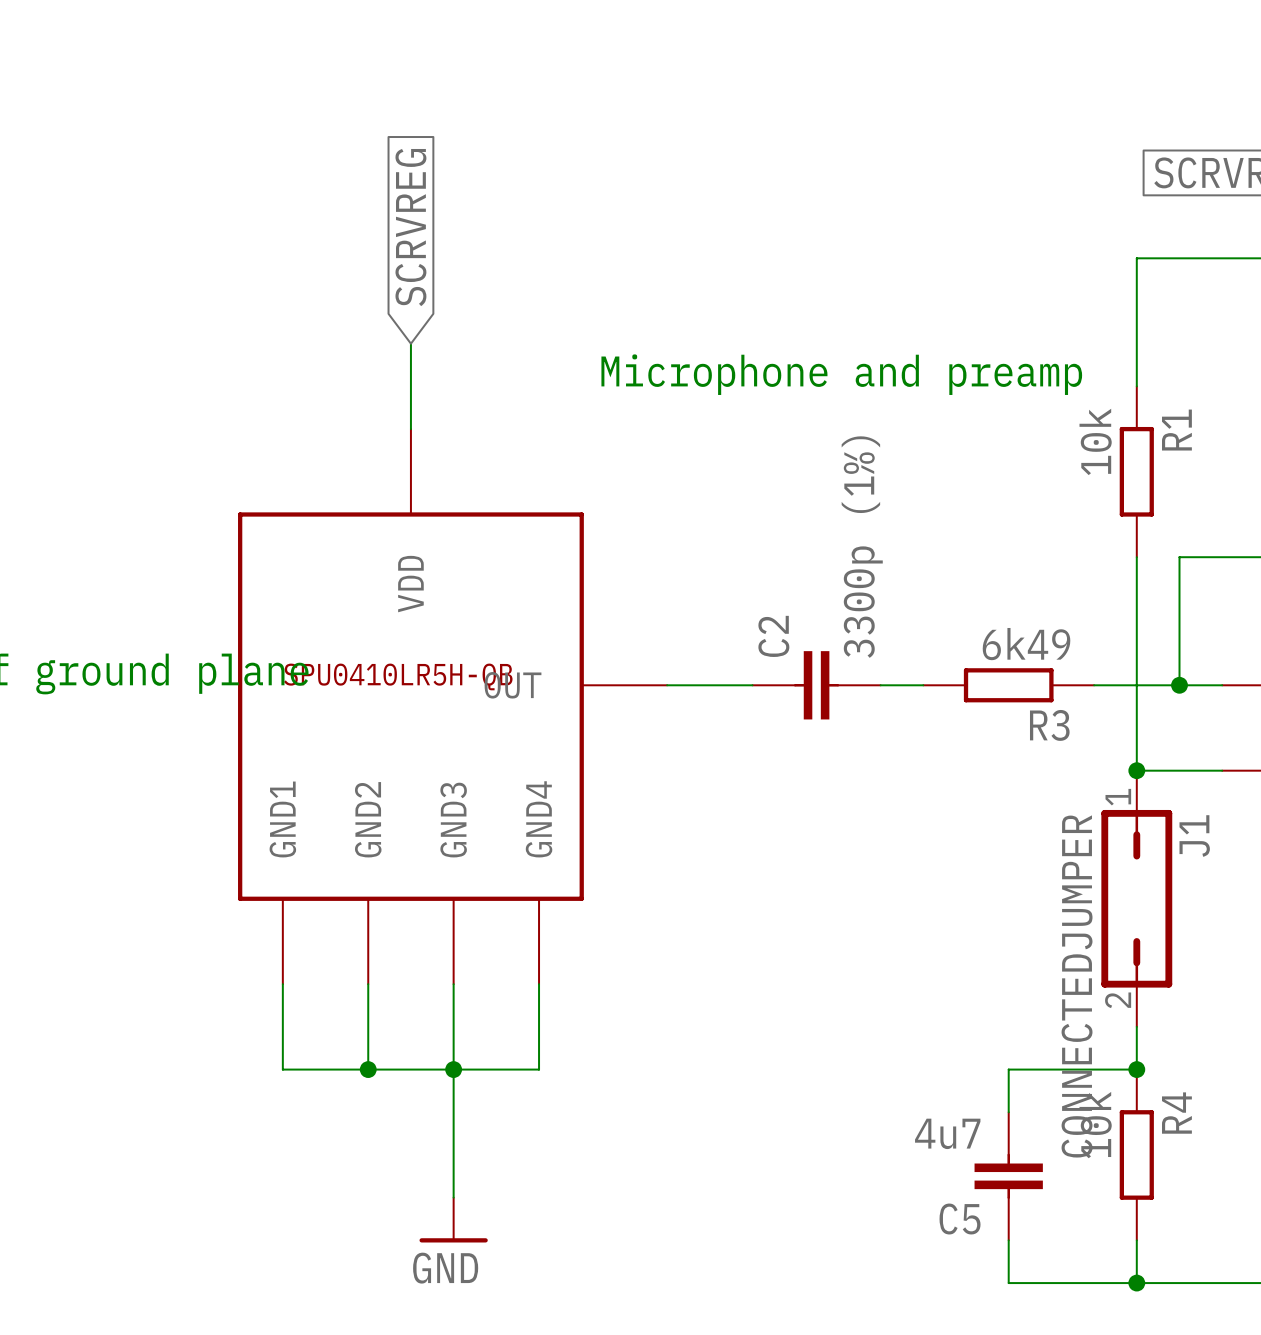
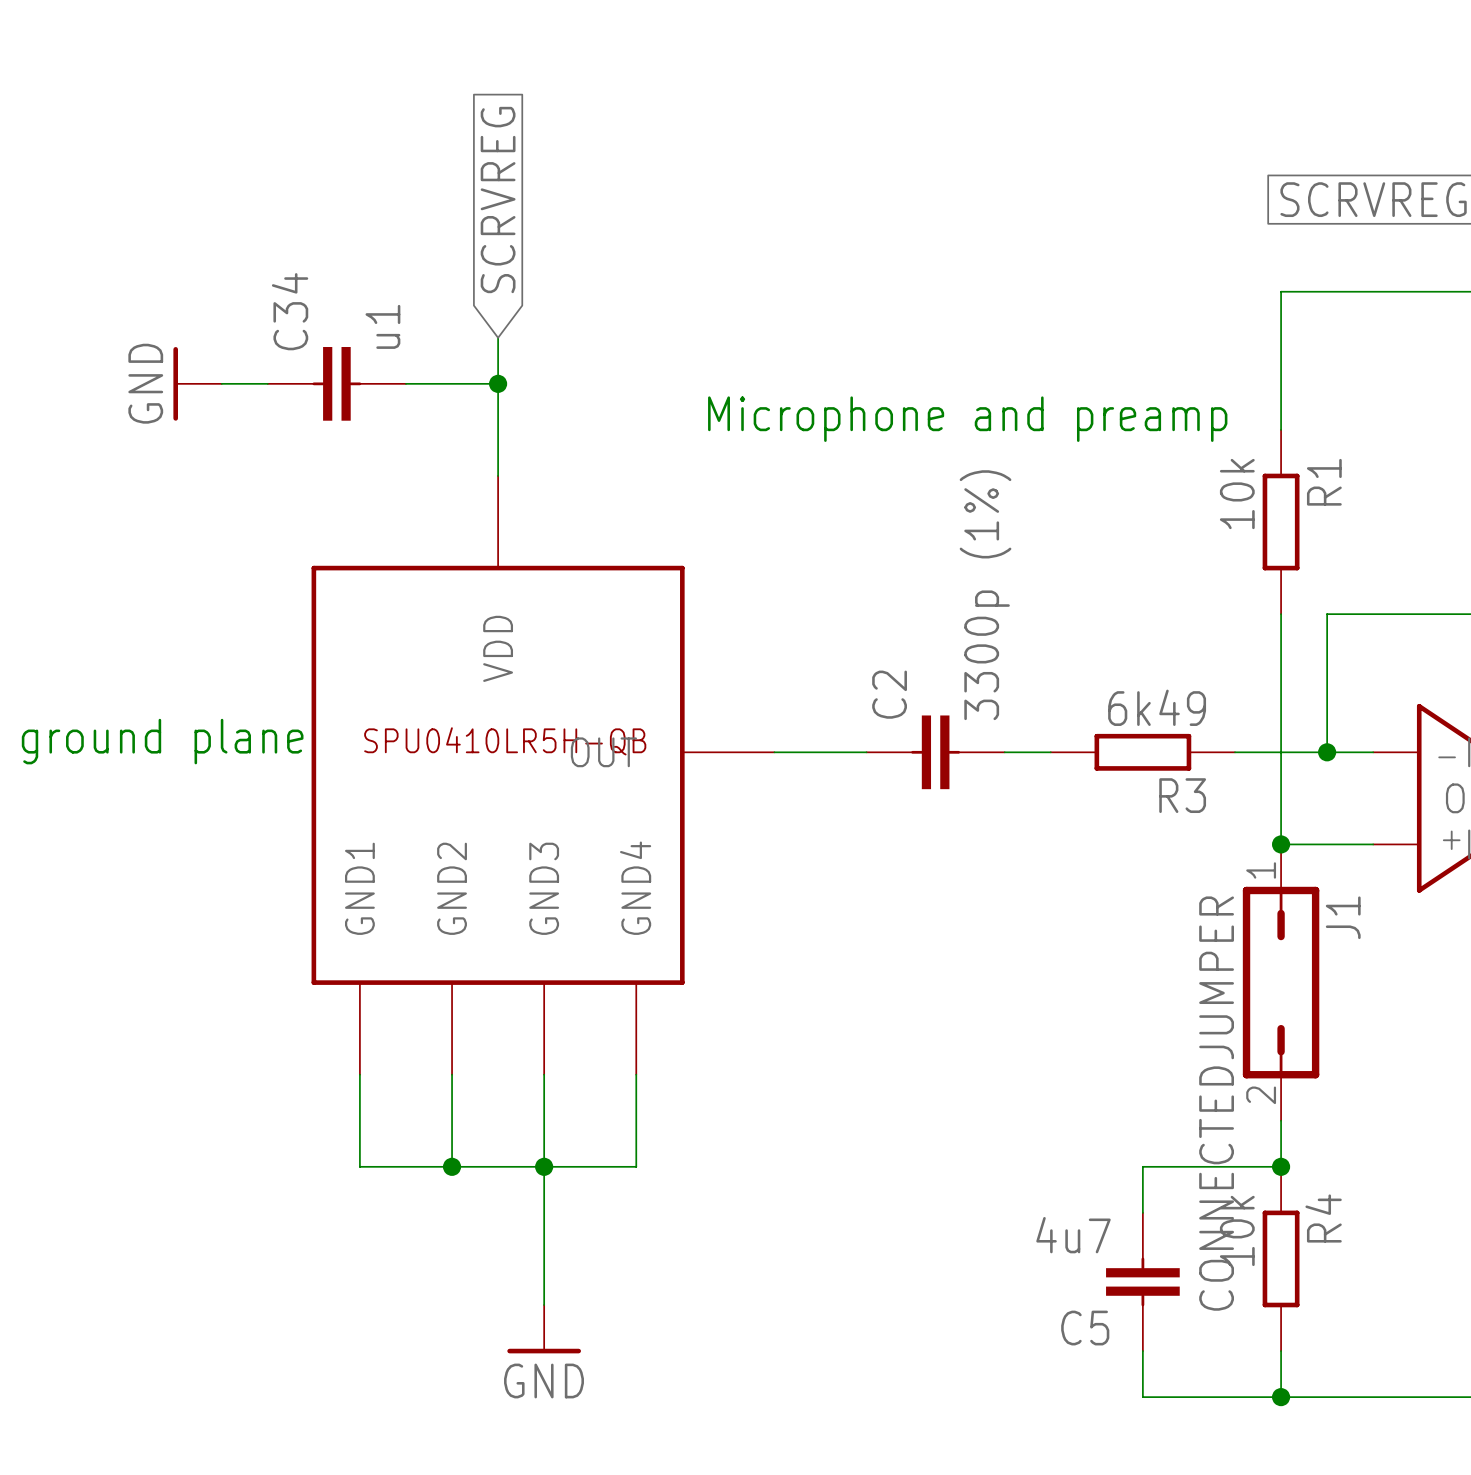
global label position: SCRVREG (410, 227) -> SCRVREG (498, 200)
wire: none -> (498, 337) (498, 383) (405, 383)
power symbol: none -> GND (197, 383)
wire: none -> (221, 383) (267, 383)
C34: none -> u1 (336, 383)
junction: none -> (498, 383)

